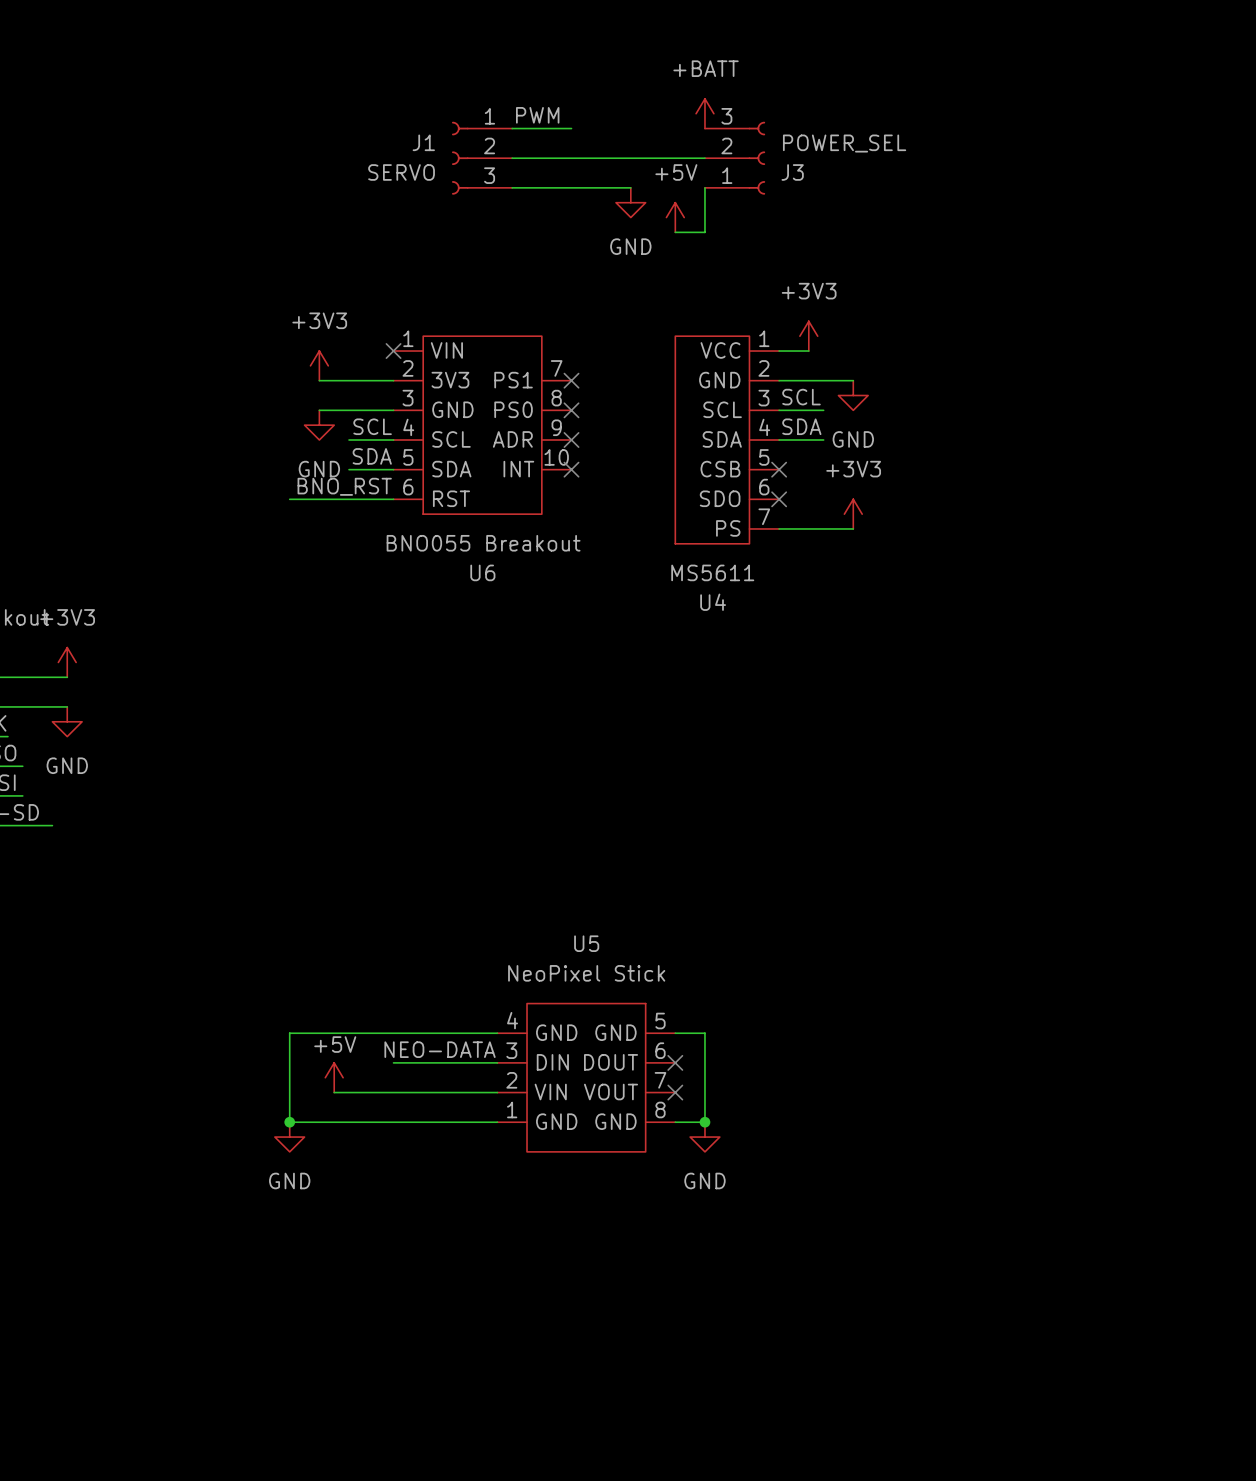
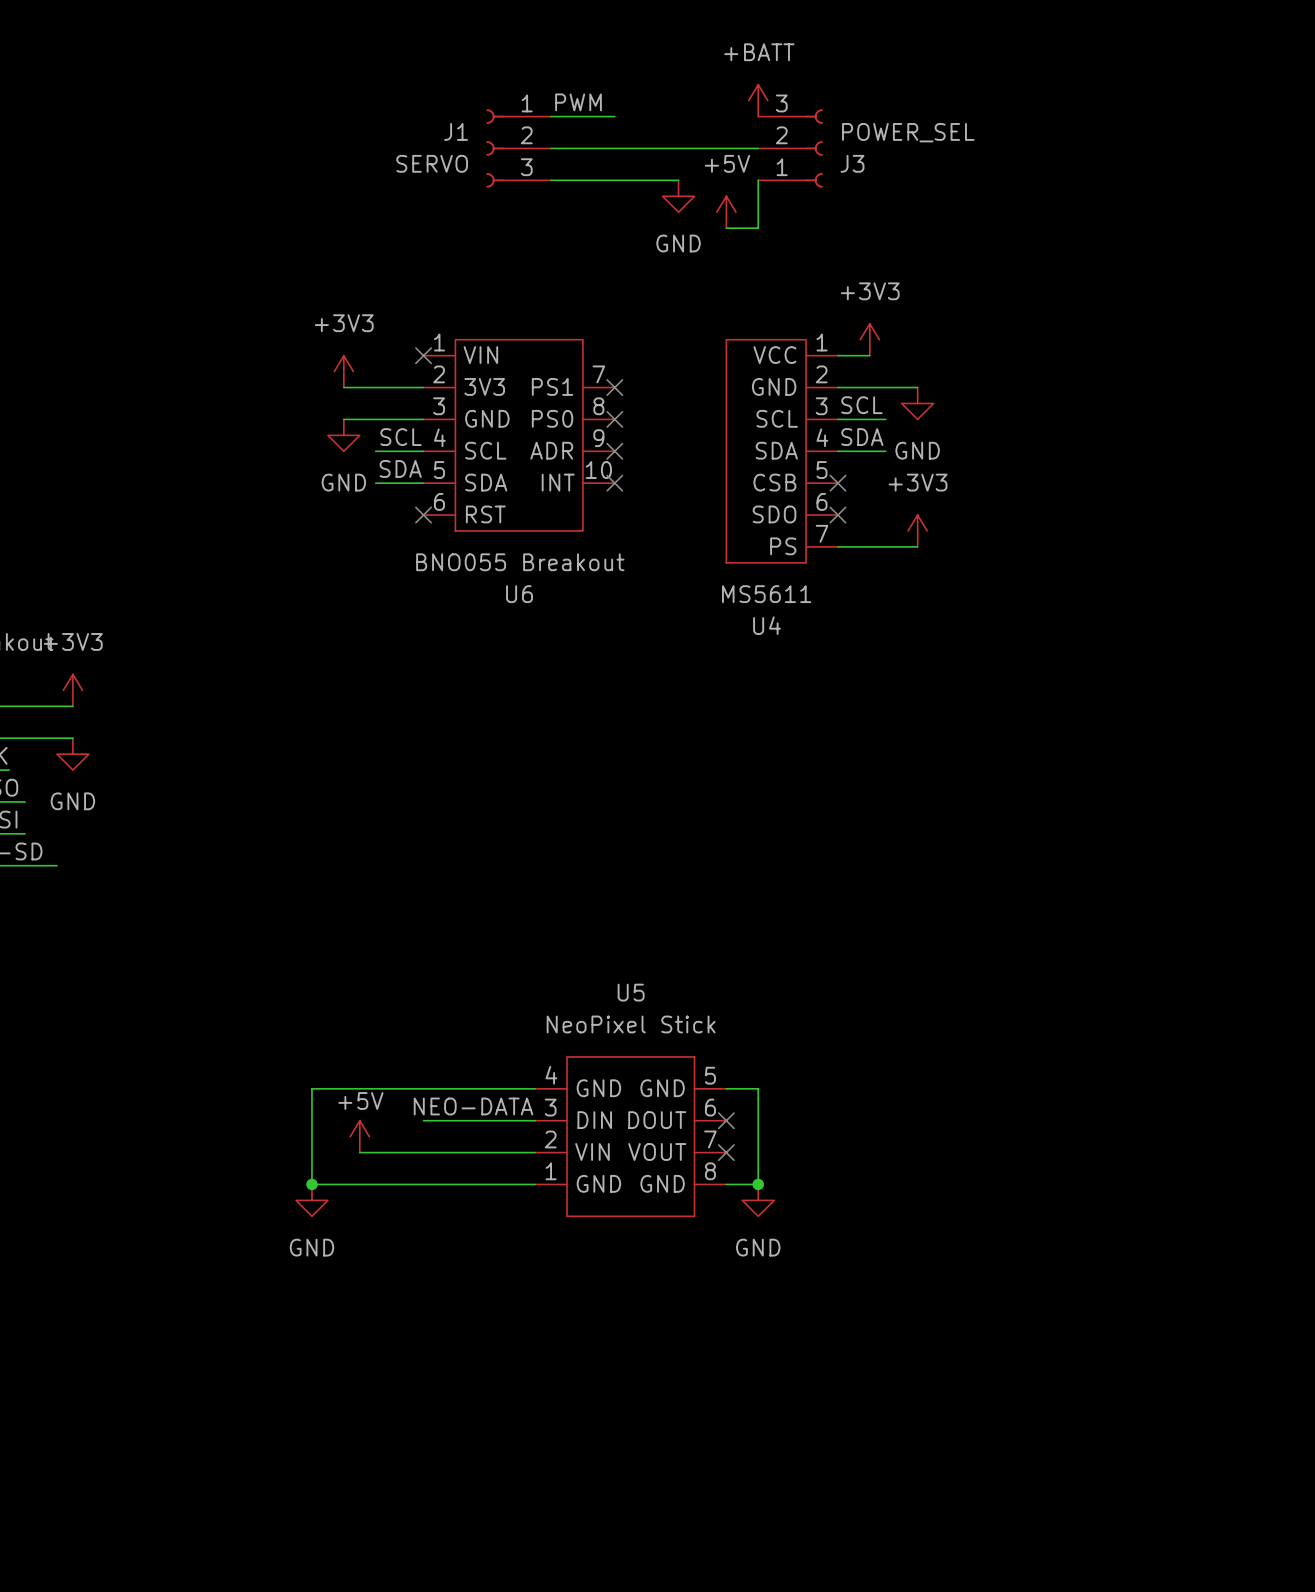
label: BNO_RST (344, 486) -> none
wire: (289, 499) (393, 499) -> none
no-connect mark: none -> (423, 515)

